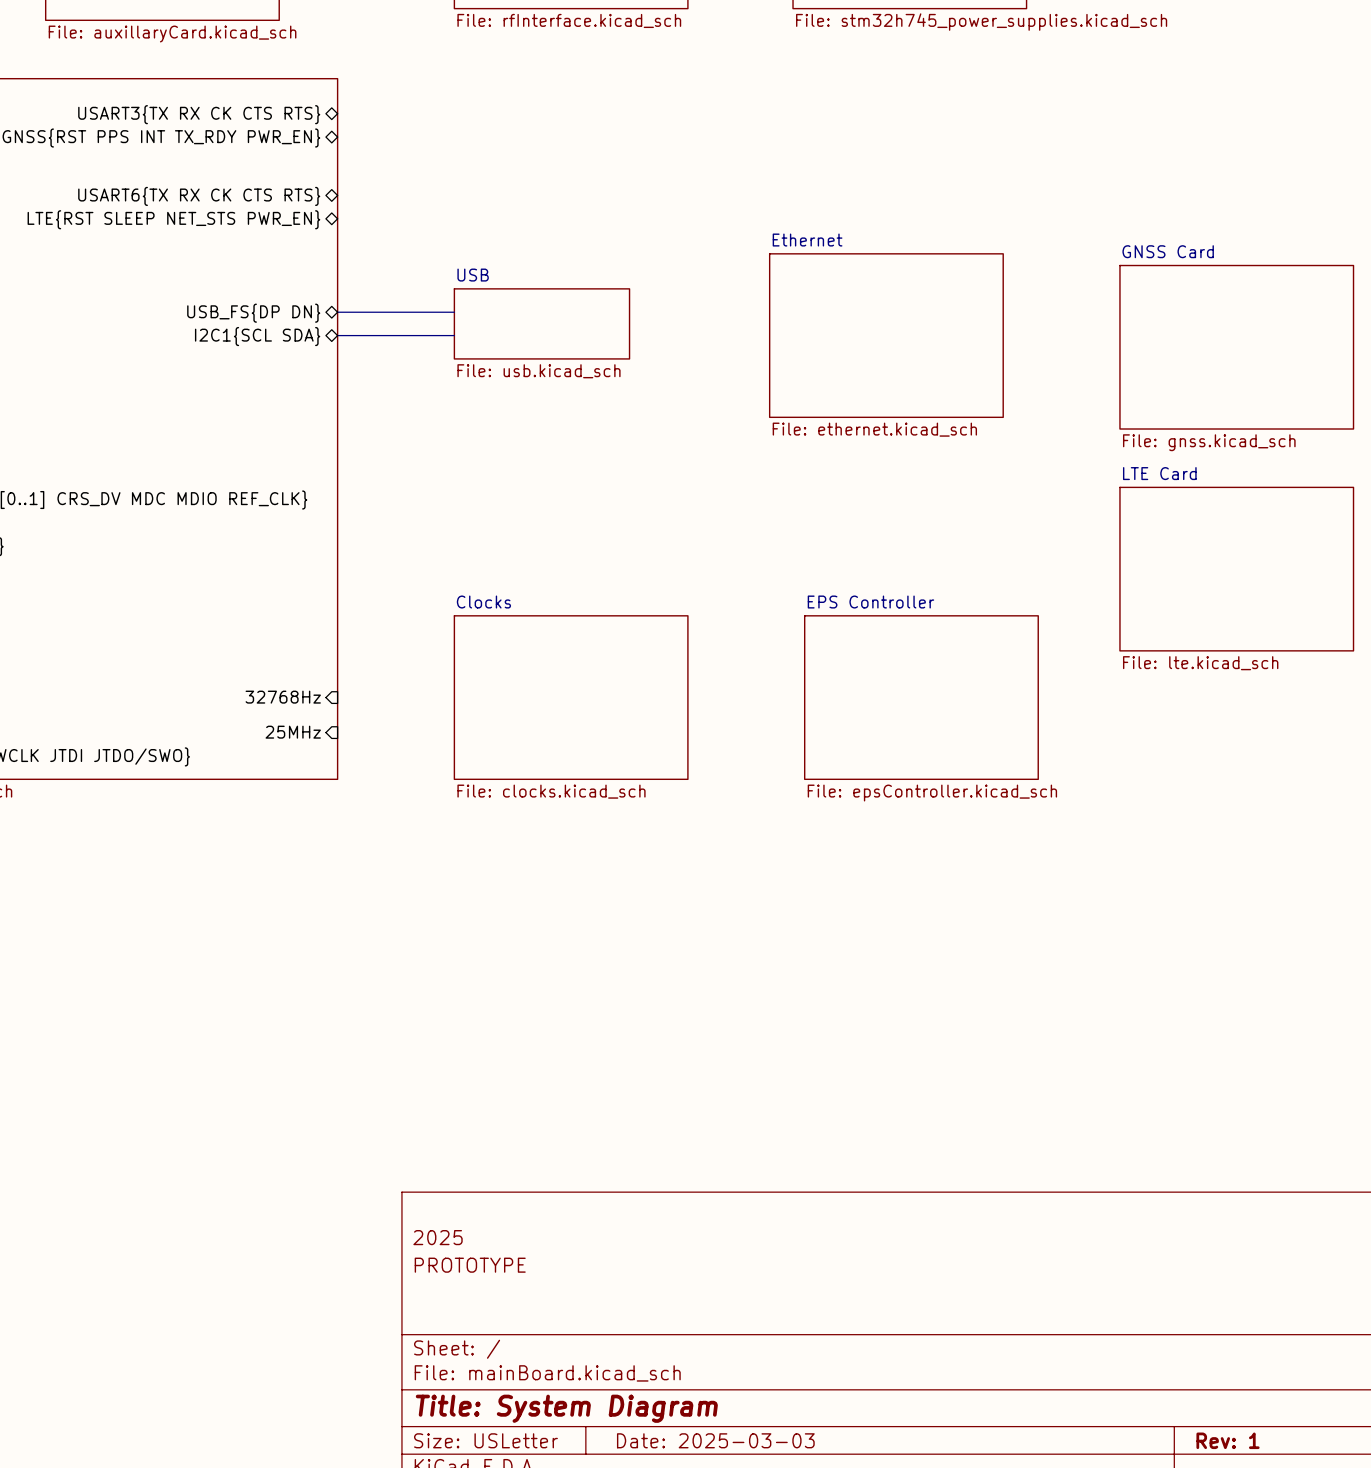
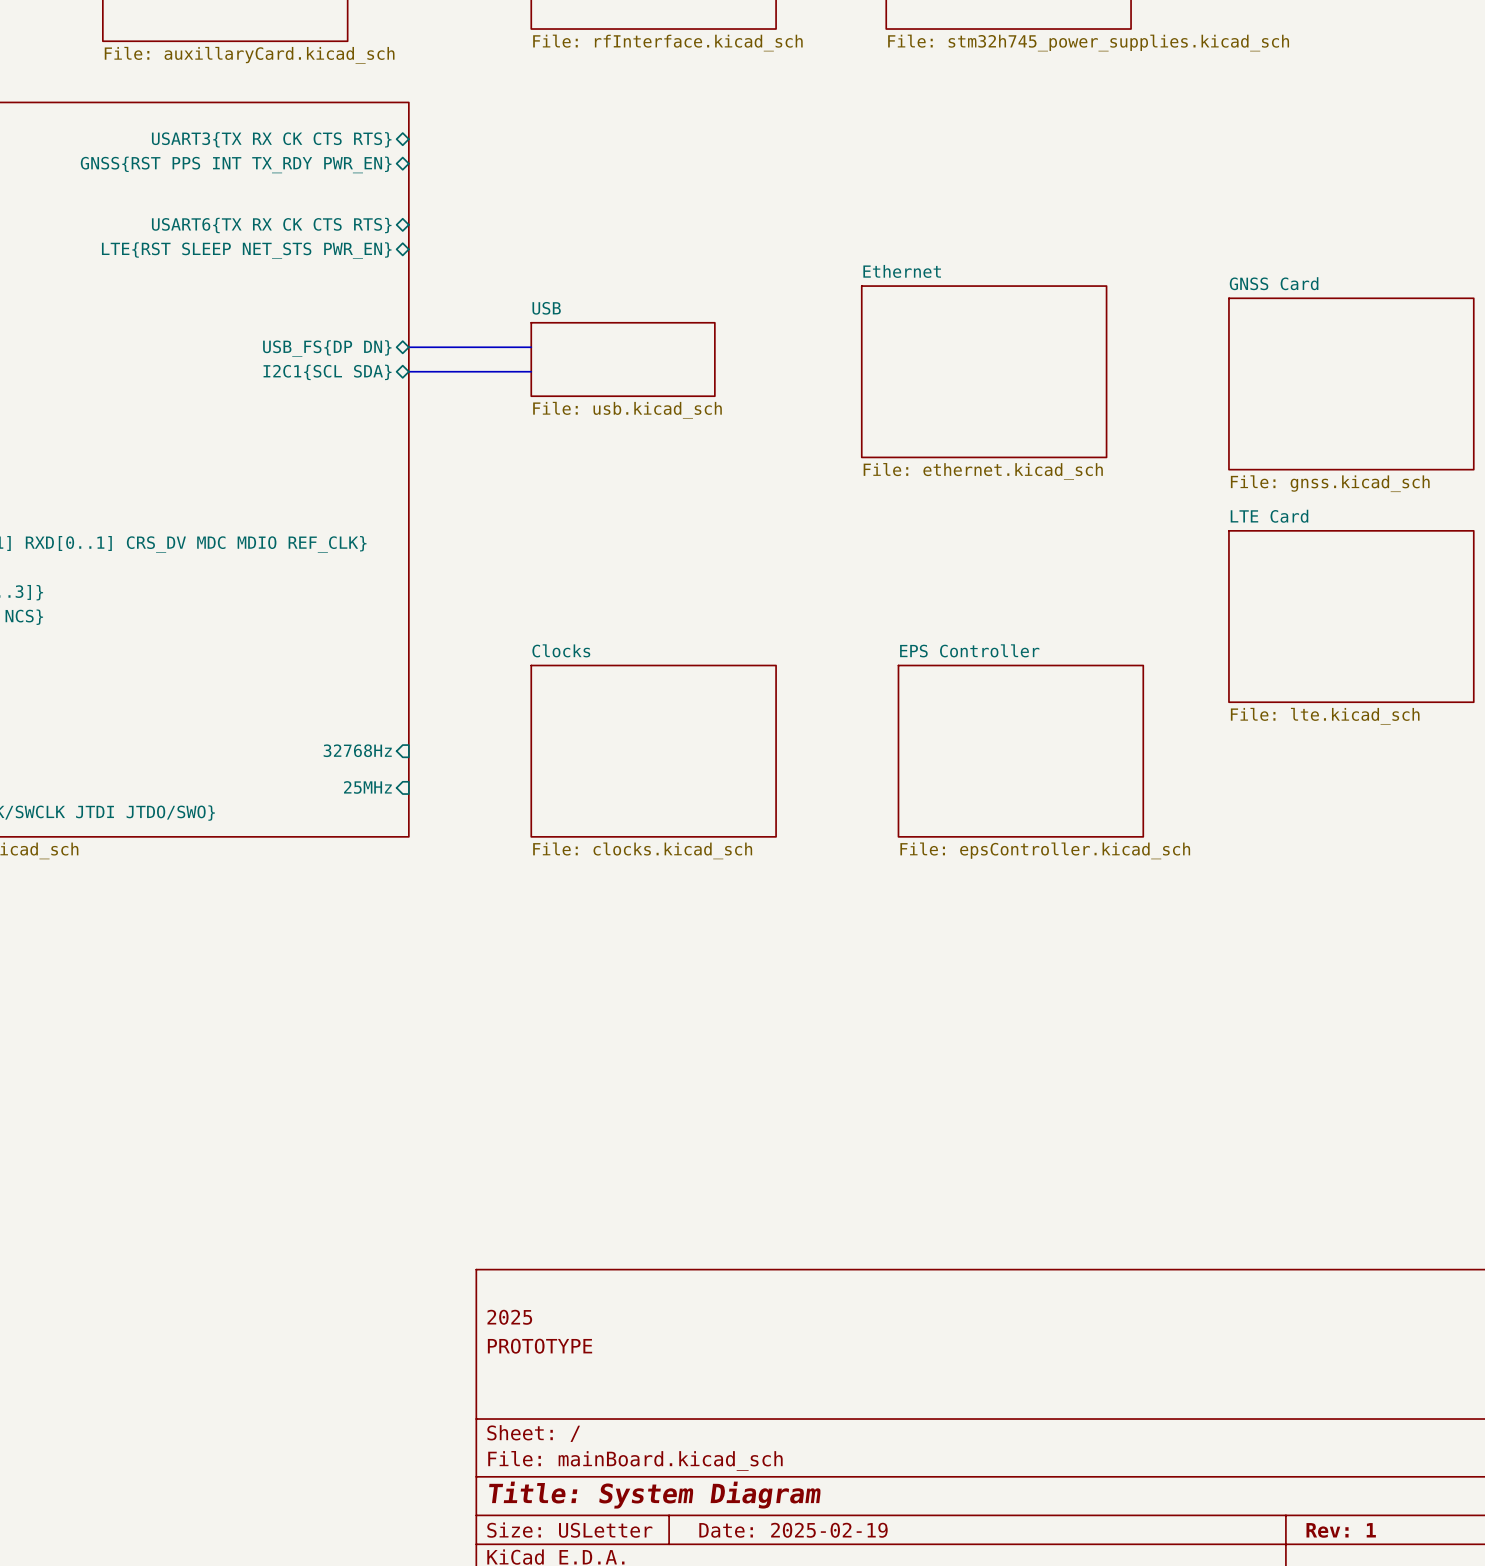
title block: Date: 2025-03-03 (715, 1440) -> Date: 2025-02-19 (793, 1530)

